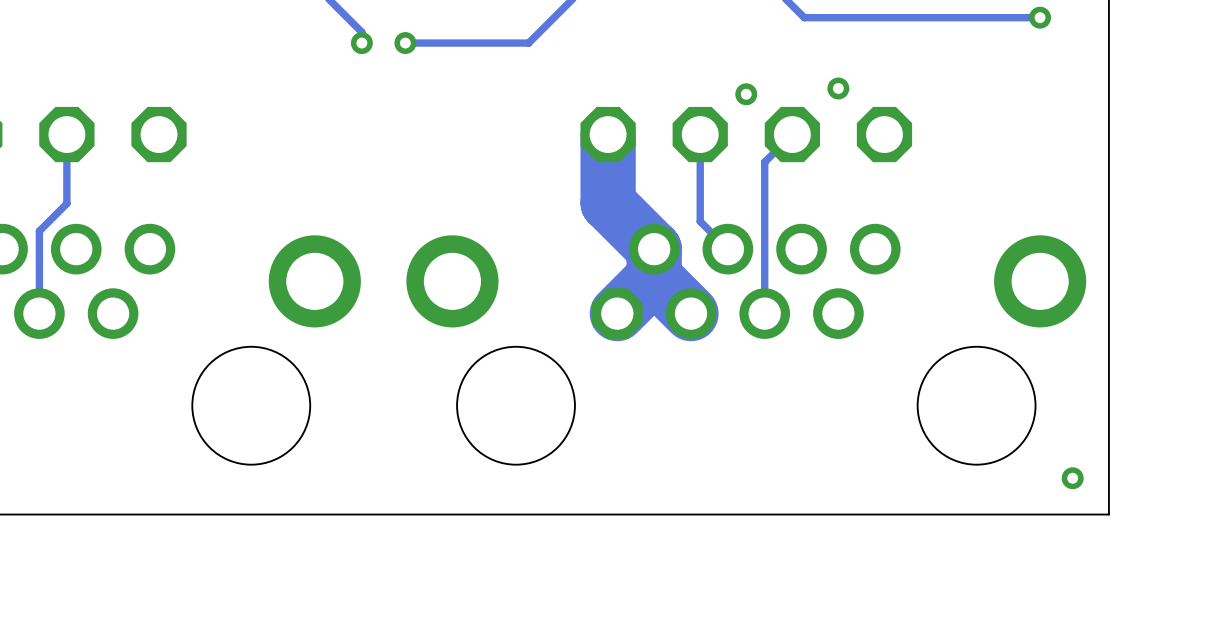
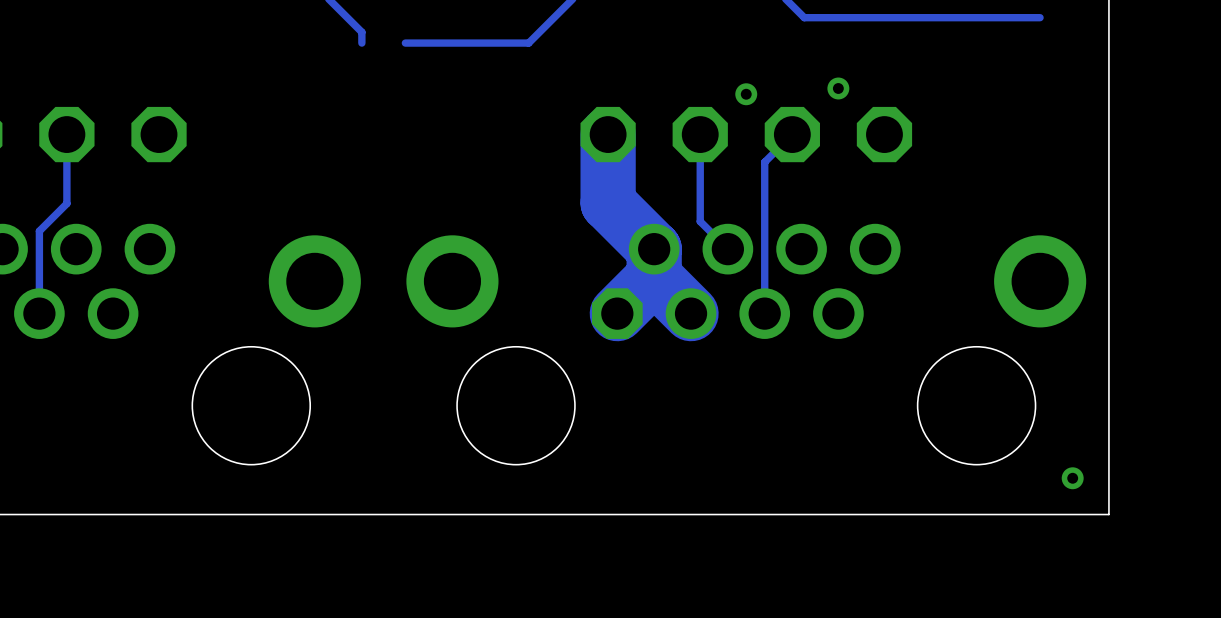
via: (1040, 17) -> none
via: (361, 43) -> none
via: (405, 43) -> none

